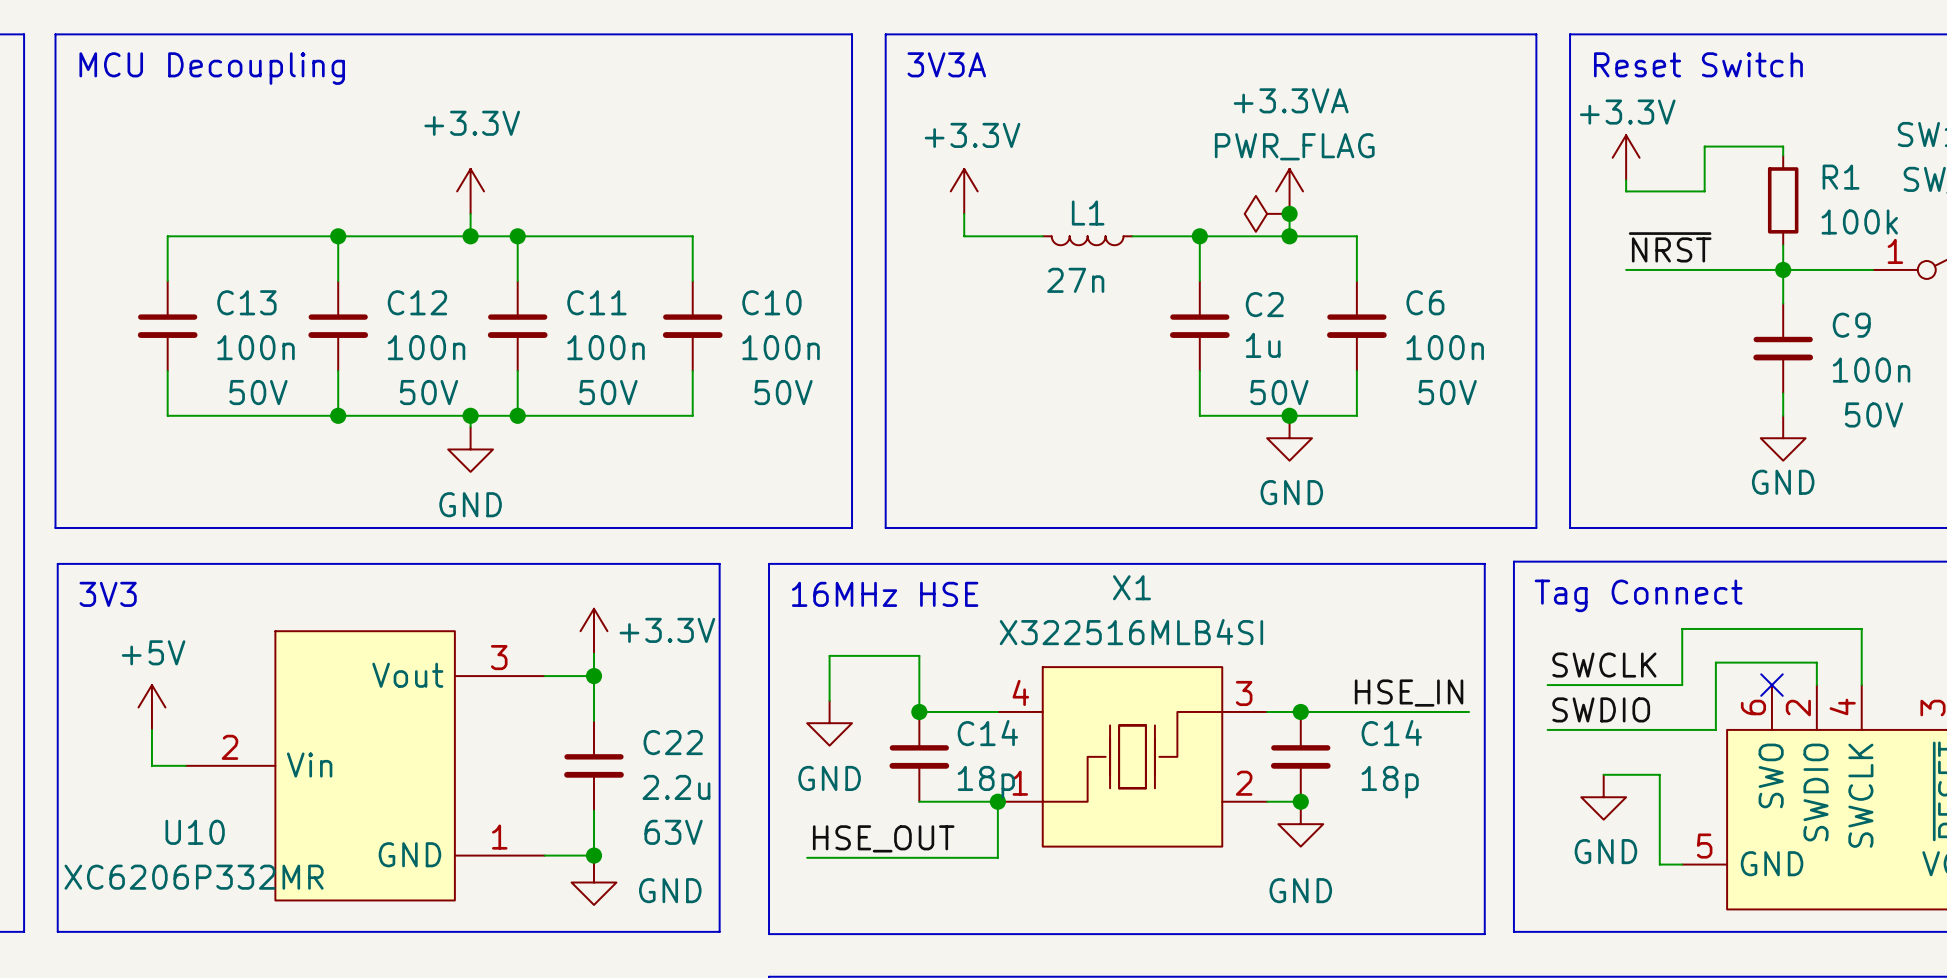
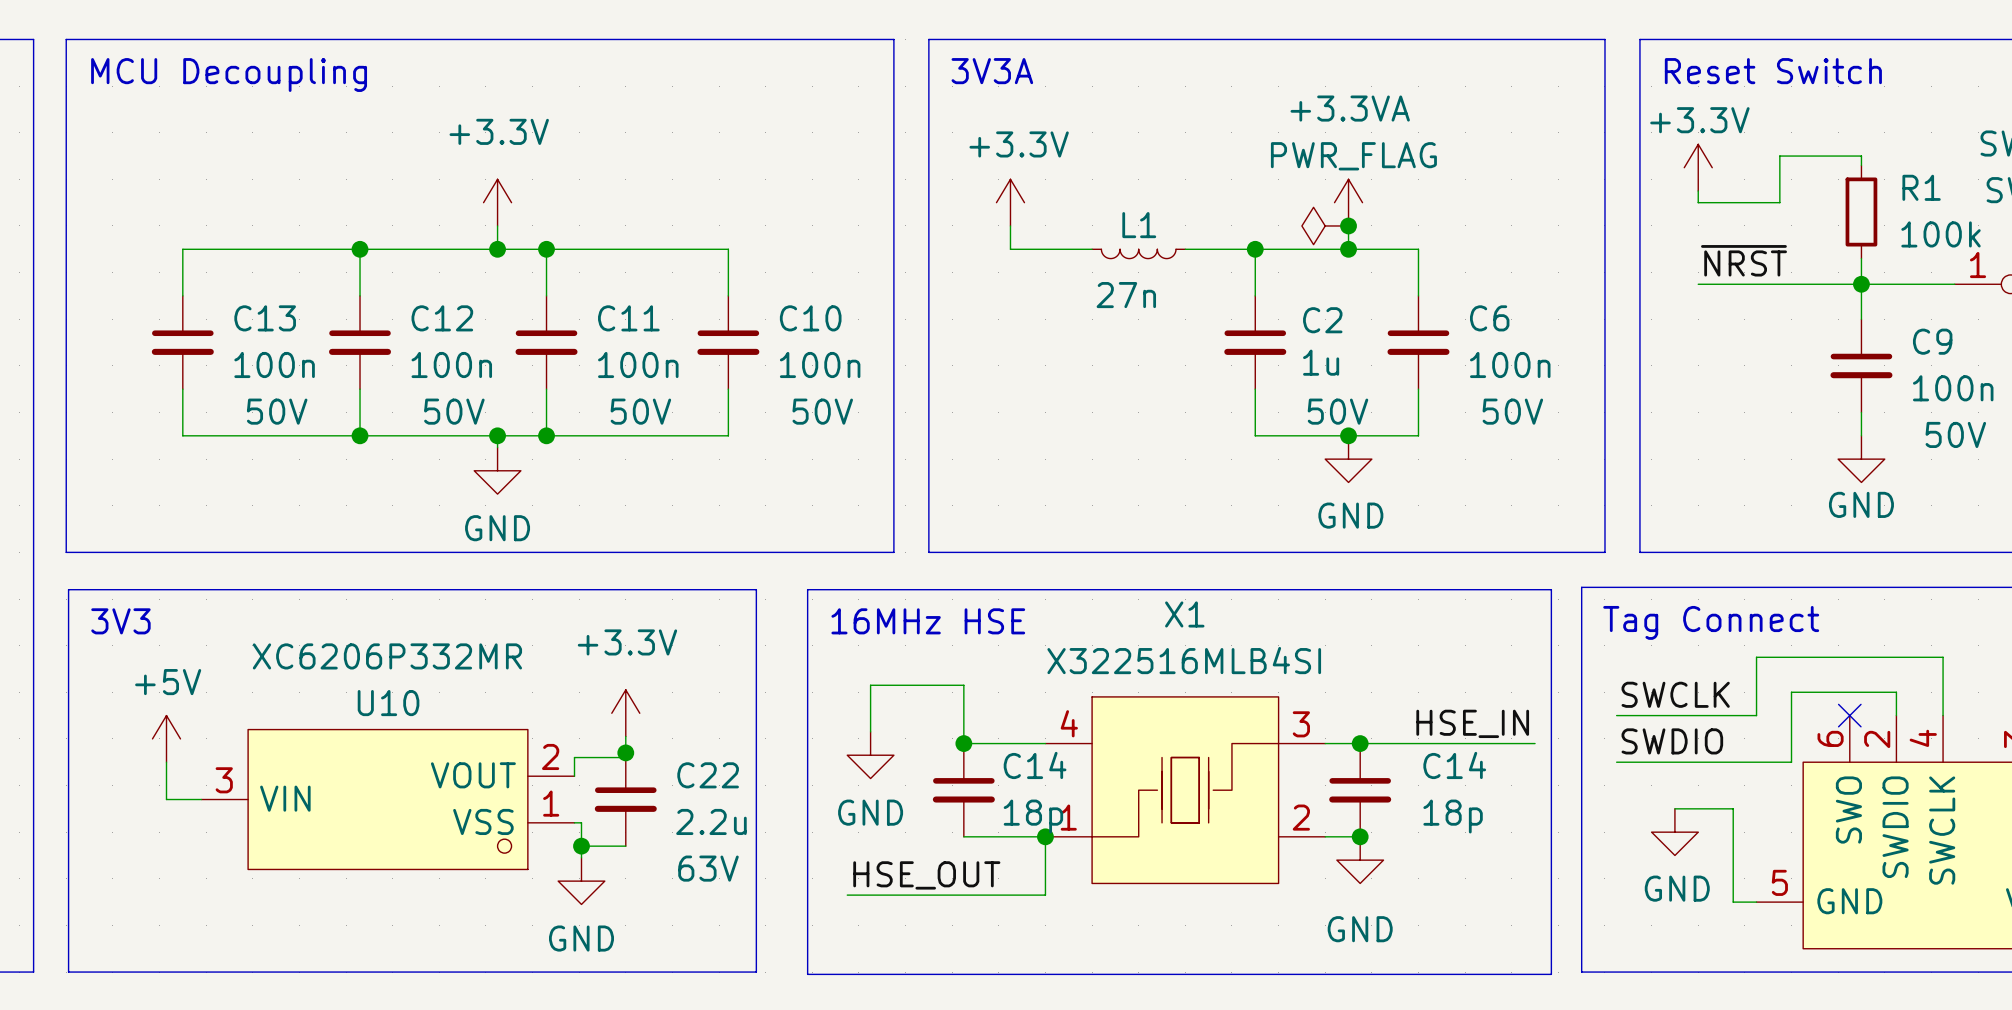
power symbol text position: +3.3V (667, 630) -> +3.3V (627, 642)
U10 symbol: [185, 631, 545, 901] -> [201, 729, 575, 870]
power symbol position: +3.3V (594, 631) -> +3.3V (625, 713)
wire: (544, 676) (594, 676) -> none
junction position: (594, 676) -> (625, 752)
wire: none -> (625, 752) (625, 757) (574, 757) (574, 776)
wire: none -> (574, 822) (581, 822) (581, 857)
wire: (594, 810) (594, 860) -> (625, 846) (581, 846)
U10 name position: U10 (195, 832) -> U10 (388, 703)
wire: (544, 855) (594, 855) -> none
junction position: (594, 855) -> (581, 846)
U10 value position: XC6206P332MR (194, 877) -> XC6206P332MR (387, 656)
power symbol position: GND (594, 882) -> GND (581, 881)
power symbol text position: GND (670, 890) -> GND (581, 938)

